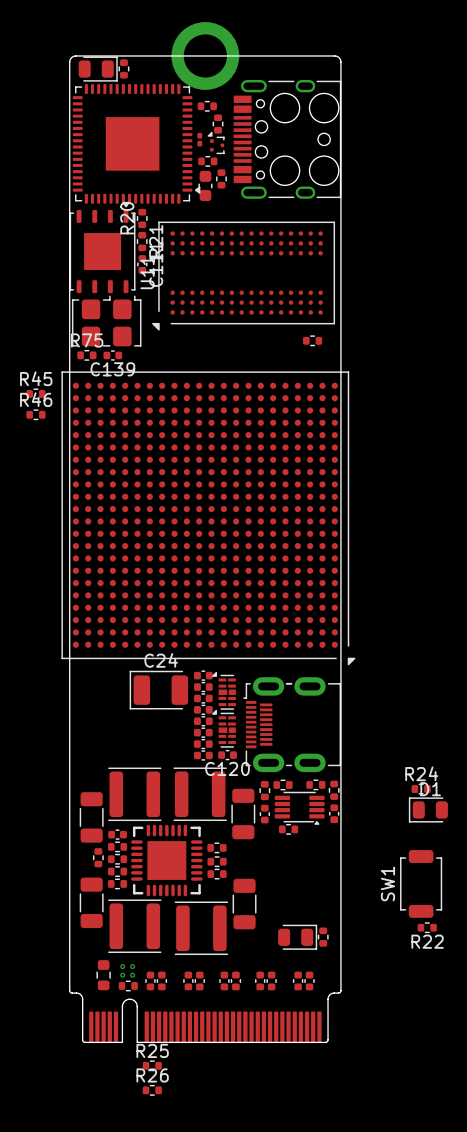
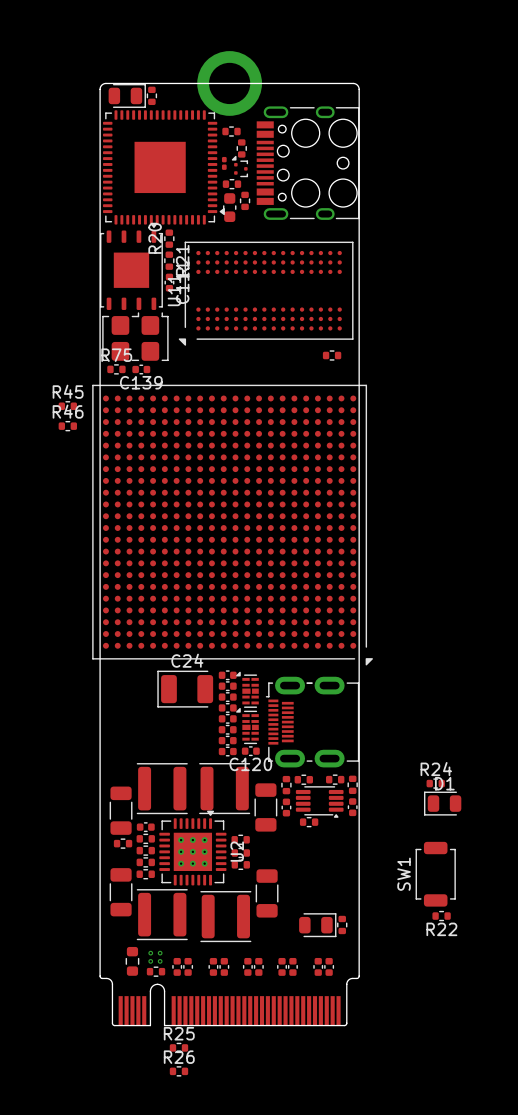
U2: none -> (192, 848)
part rotation: 0° (98, 857) -> 90° clockwise (123, 843)
part: (166, 859) -> none

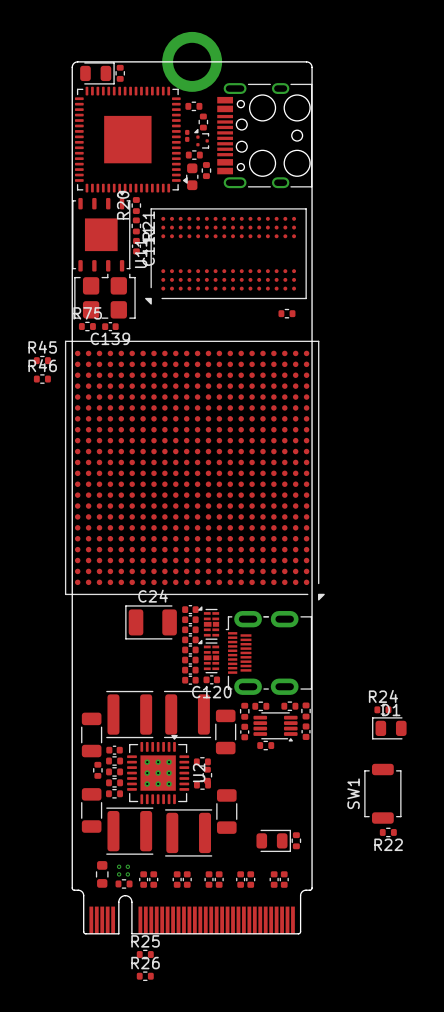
part rotation: 0° (123, 843) -> 90° clockwise (97, 770)
part rotation: 0° (240, 852) -> 90° clockwise (207, 775)

